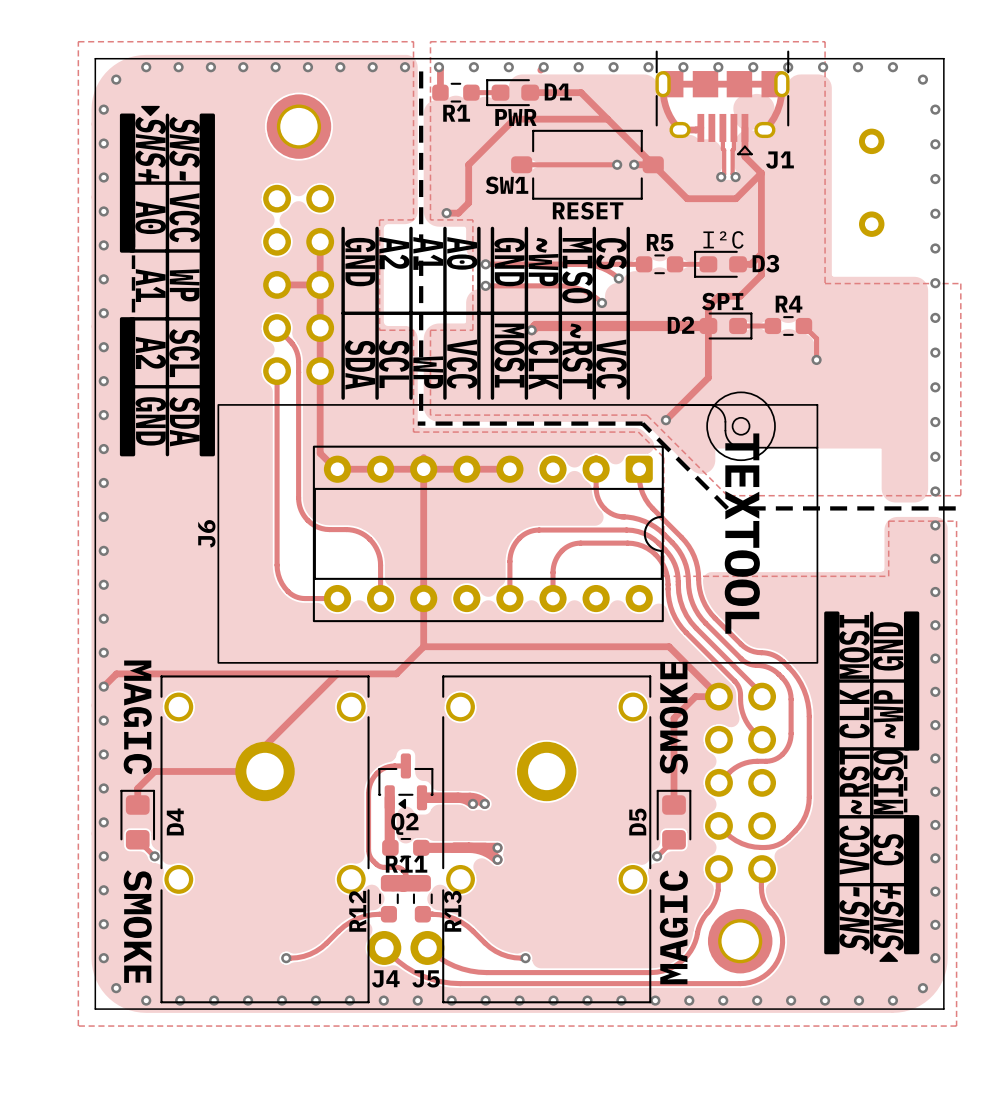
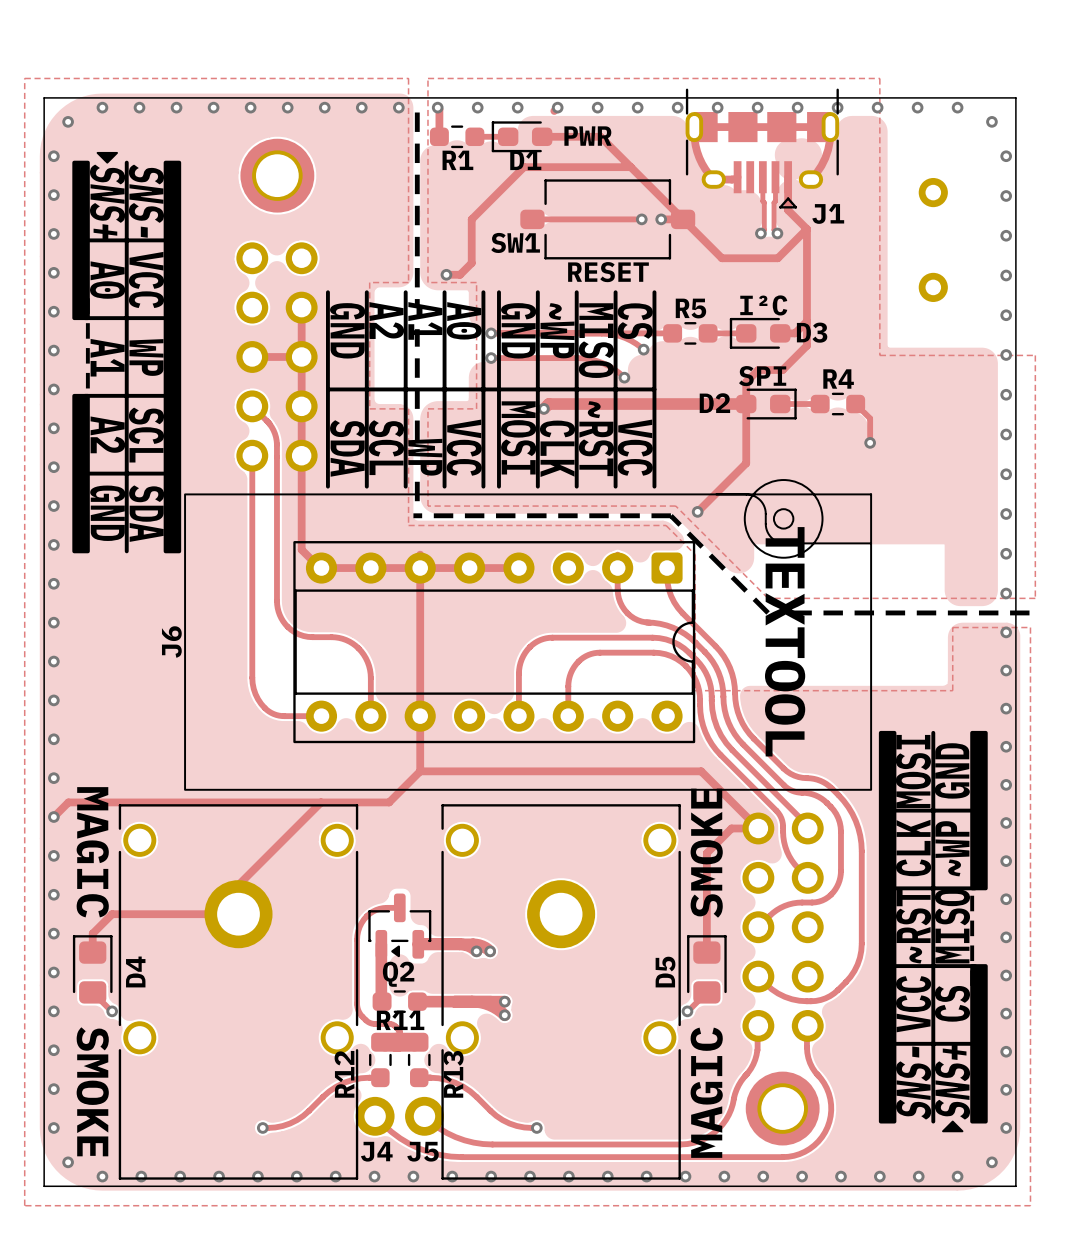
D1 name position: D1 (558, 92) -> D1 (525, 160)
D1 value: none -> PWR (588, 136)
D1 text: PWR (515, 117) -> none
D3 text: I²C (723, 239) -> none
D3 value: none -> I²C (763, 305)

